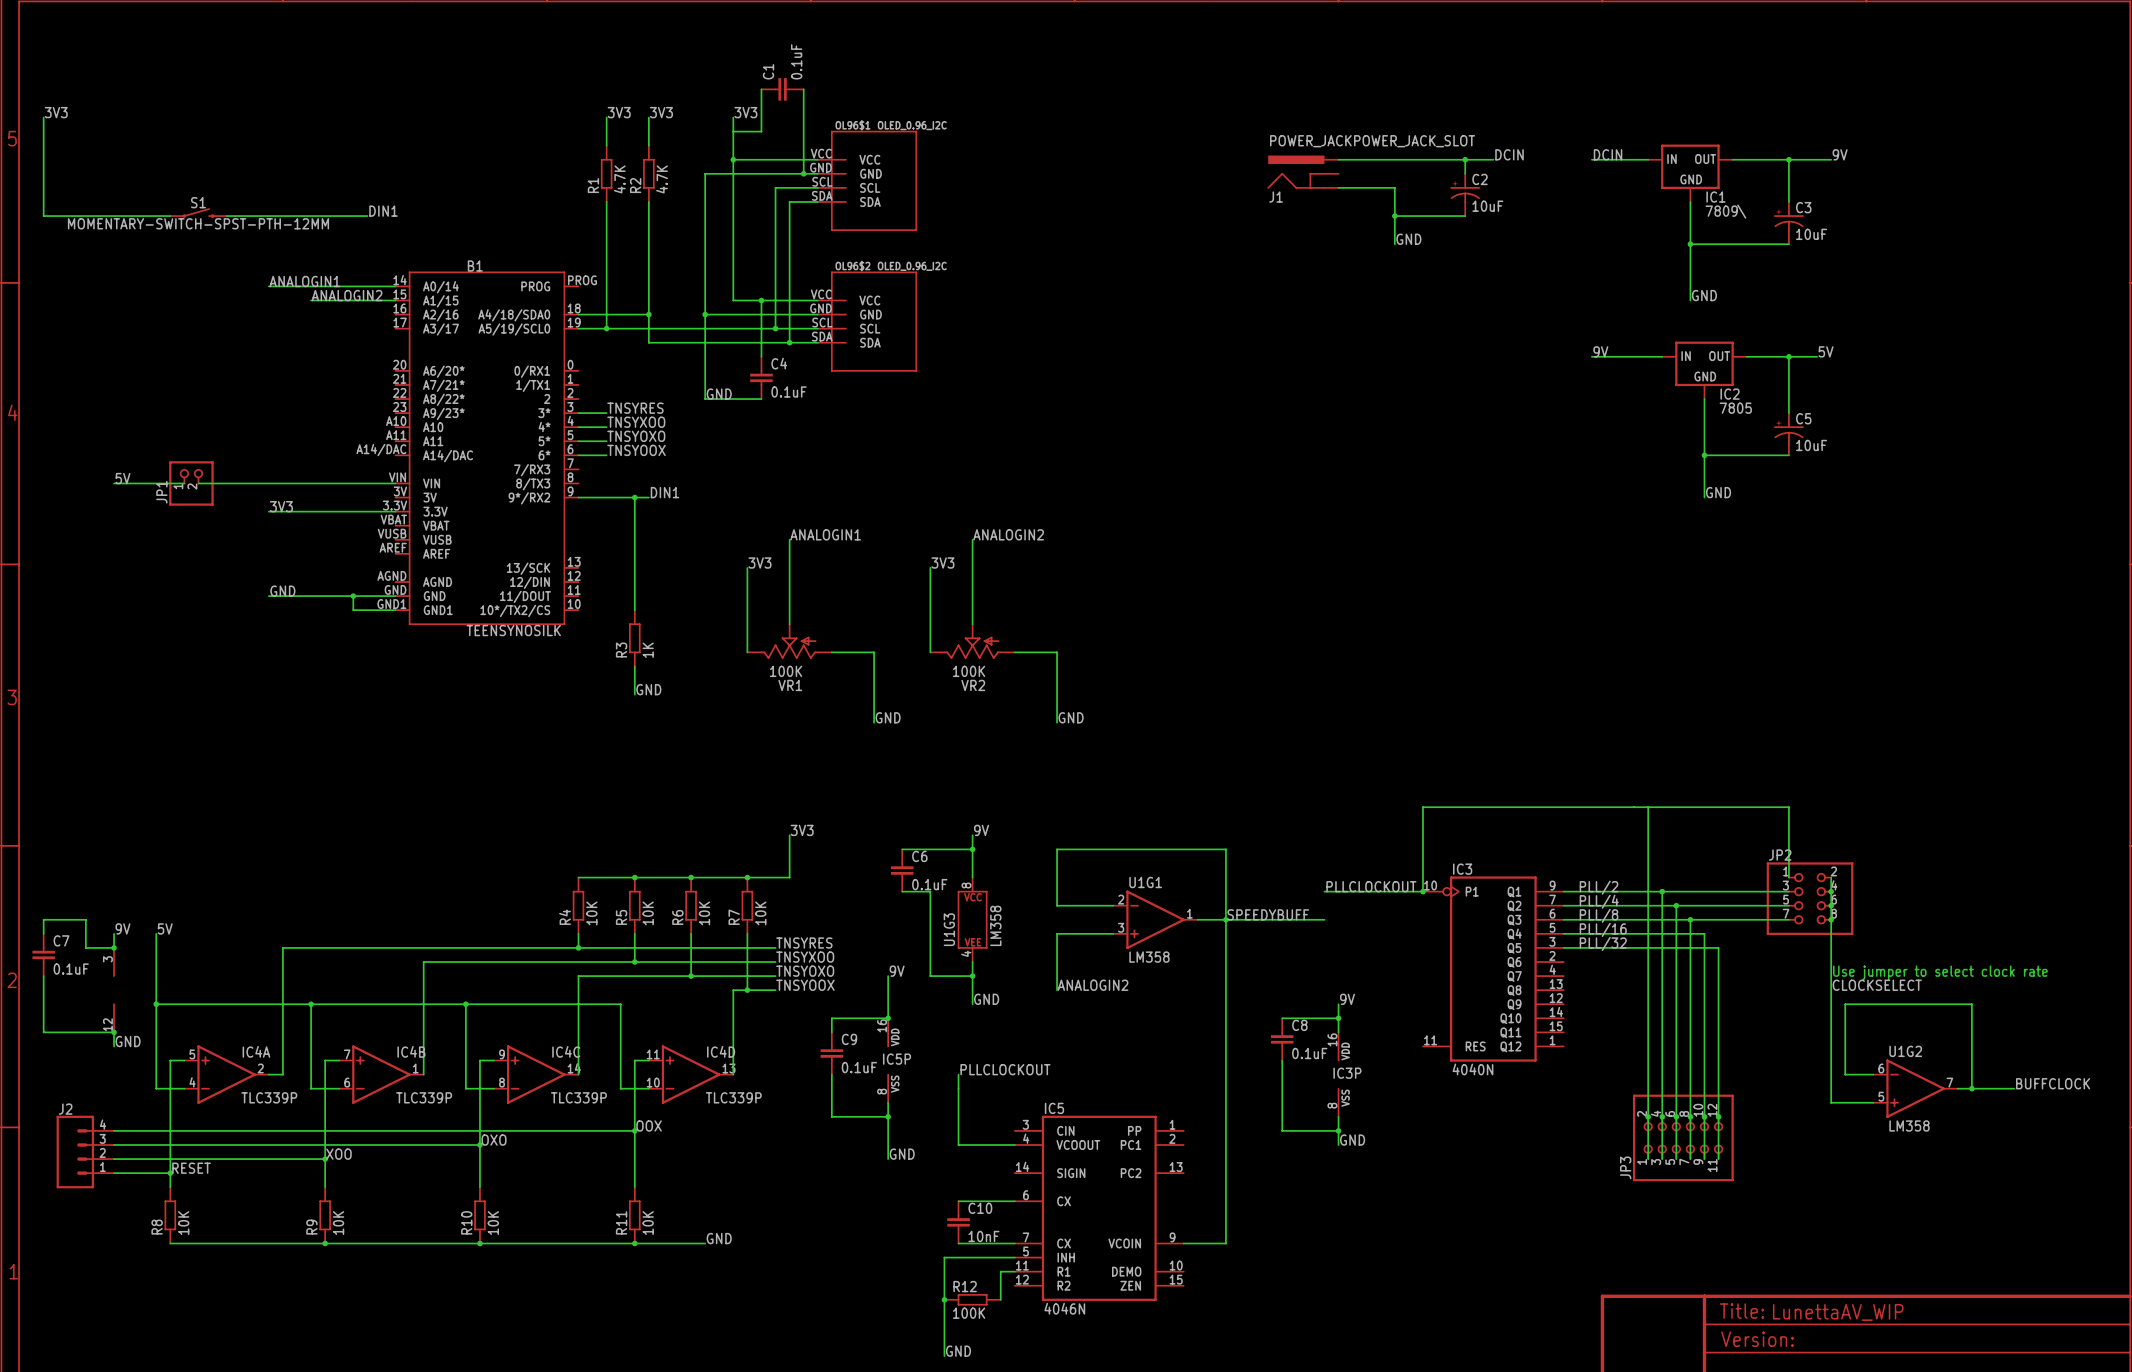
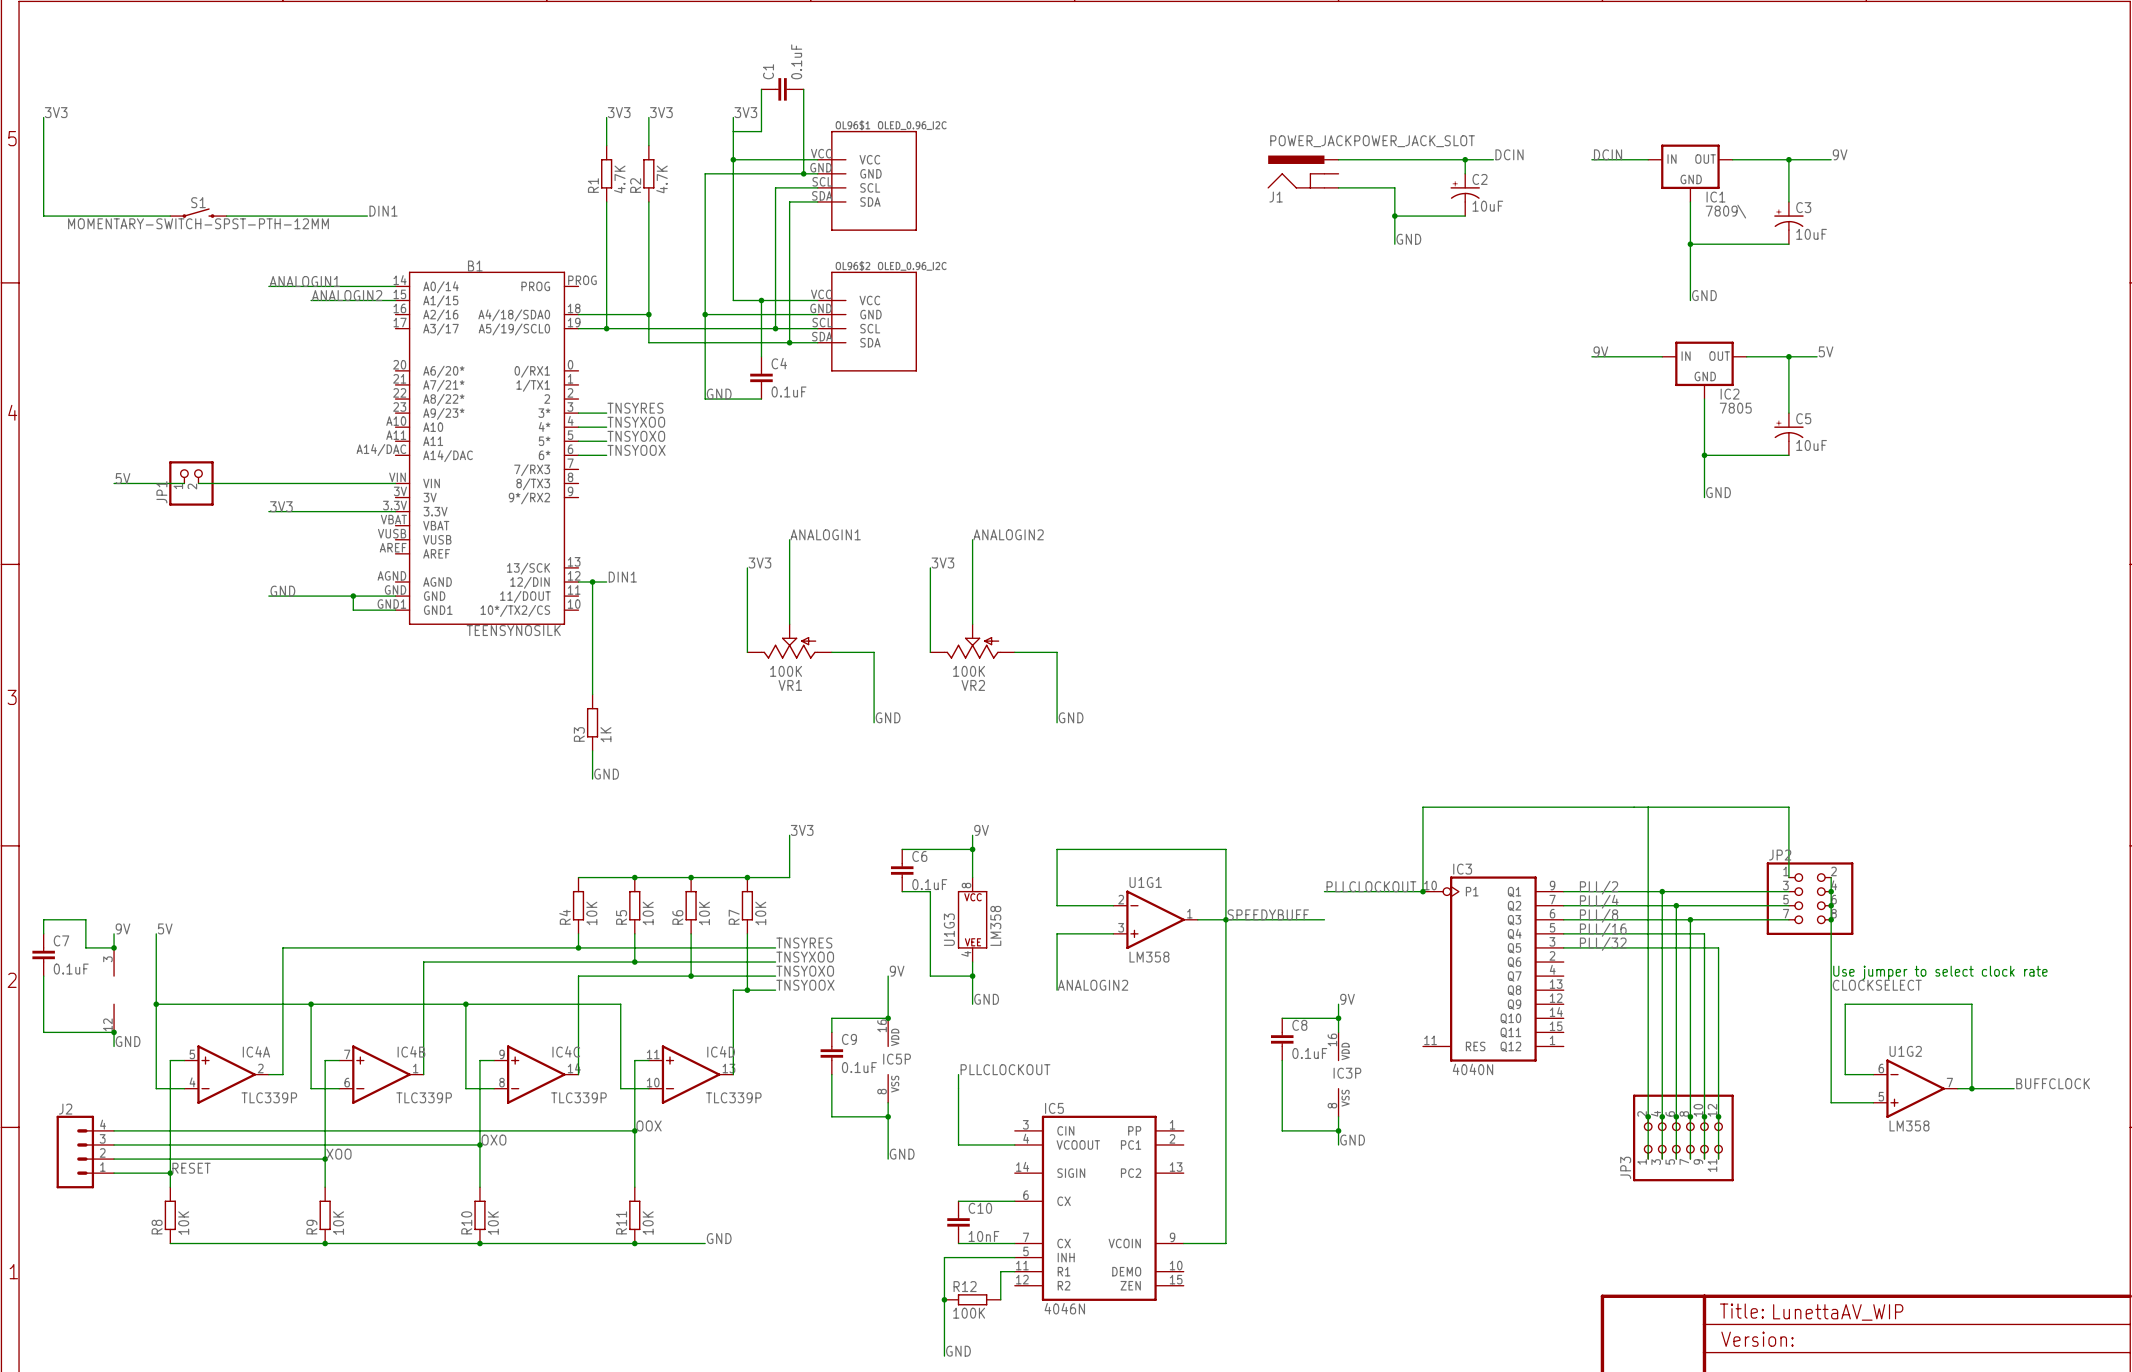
label position: DIN1 (665, 492) -> DIN1 (622, 577)
wire: (578, 497) (648, 497) -> none
wire: (634, 497) (634, 610) -> (592, 581) (592, 694)
junction: (634, 497) -> none
wire: none -> (578, 581) (606, 581)
junction: none -> (592, 581)
R3 position: (634, 638) -> (592, 722)
wire: (634, 666) (634, 694) -> (592, 750) (592, 779)
label position: GND (648, 689) -> GND (606, 774)

